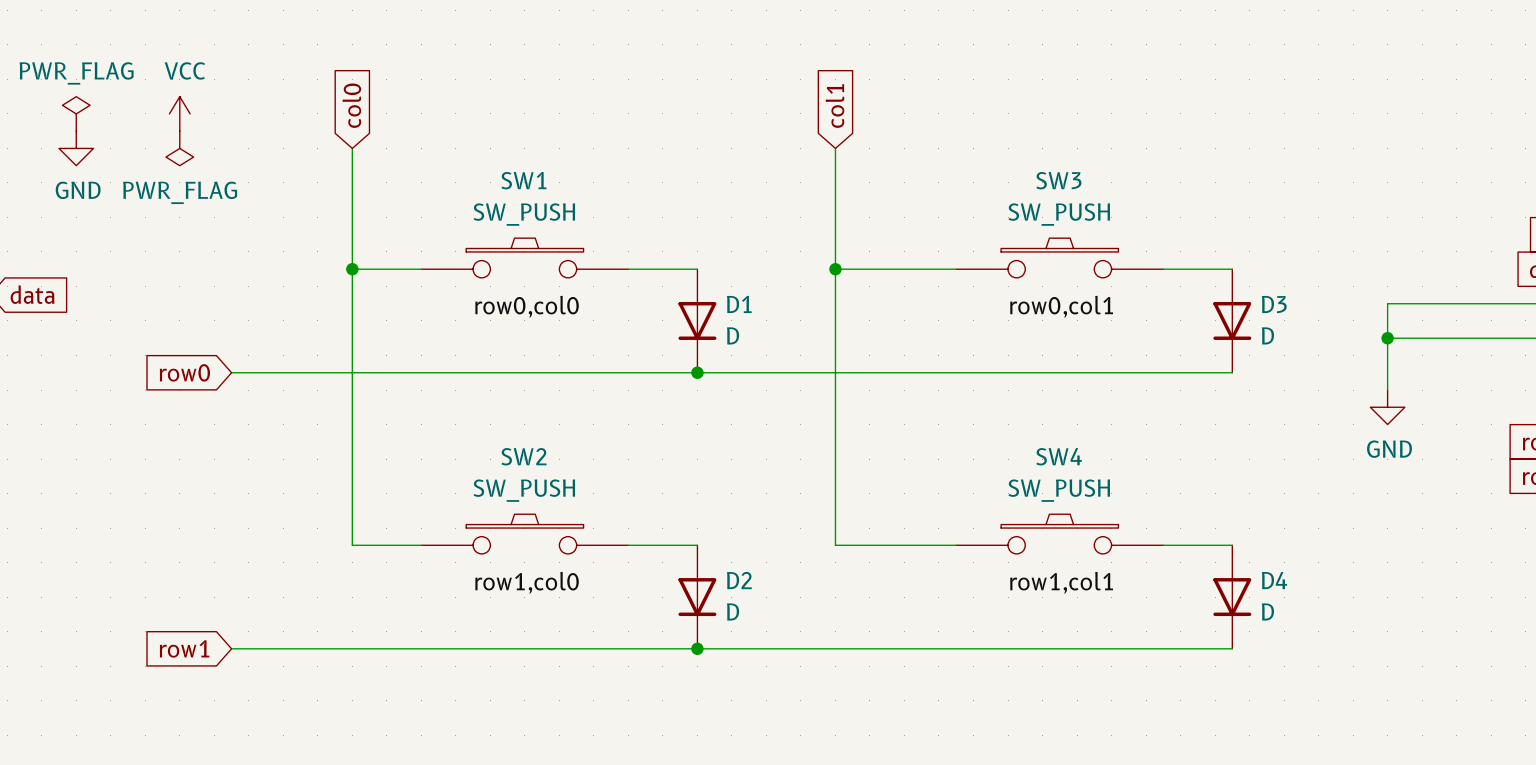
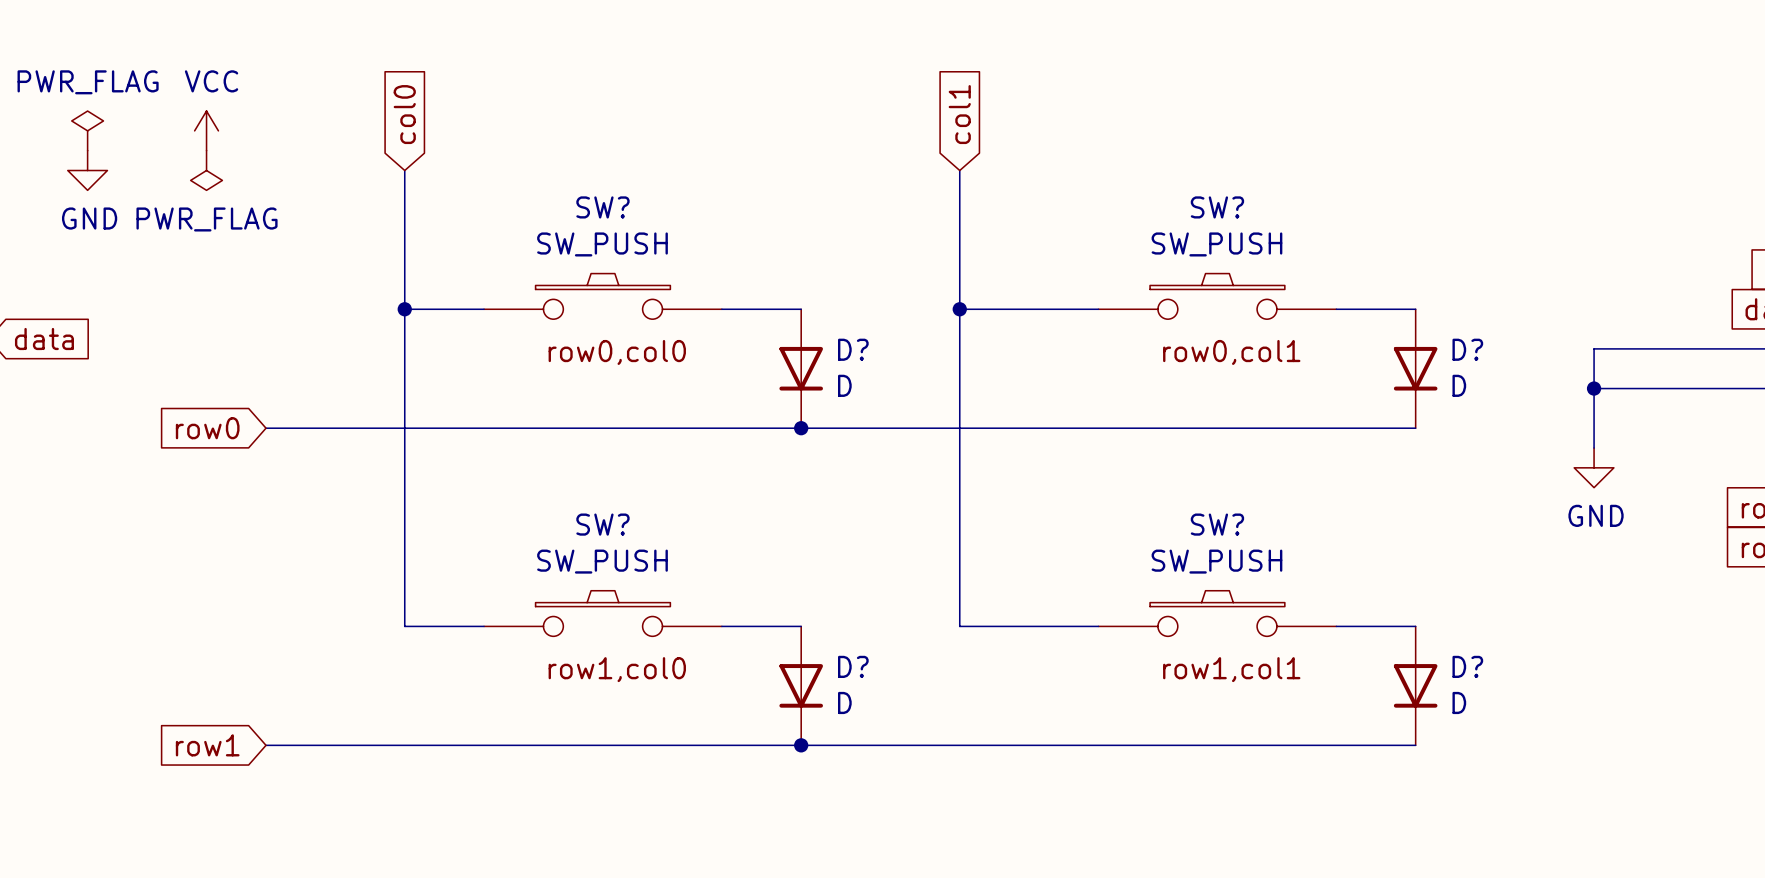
SW1 name: SW1 (523, 180) -> SW? (602, 207)
SW3 name: SW3 (1058, 180) -> SW? (1217, 207)
D1 name: D1 (739, 304) -> D? (853, 349)
D3 name: D3 (1274, 304) -> D? (1467, 349)
SW2 name: SW2 (523, 456) -> SW? (602, 524)
SW4 name: SW4 (1059, 456) -> SW? (1217, 524)
D2 name: D2 (739, 580) -> D? (853, 666)
D4 name: D4 (1274, 580) -> D? (1467, 666)

